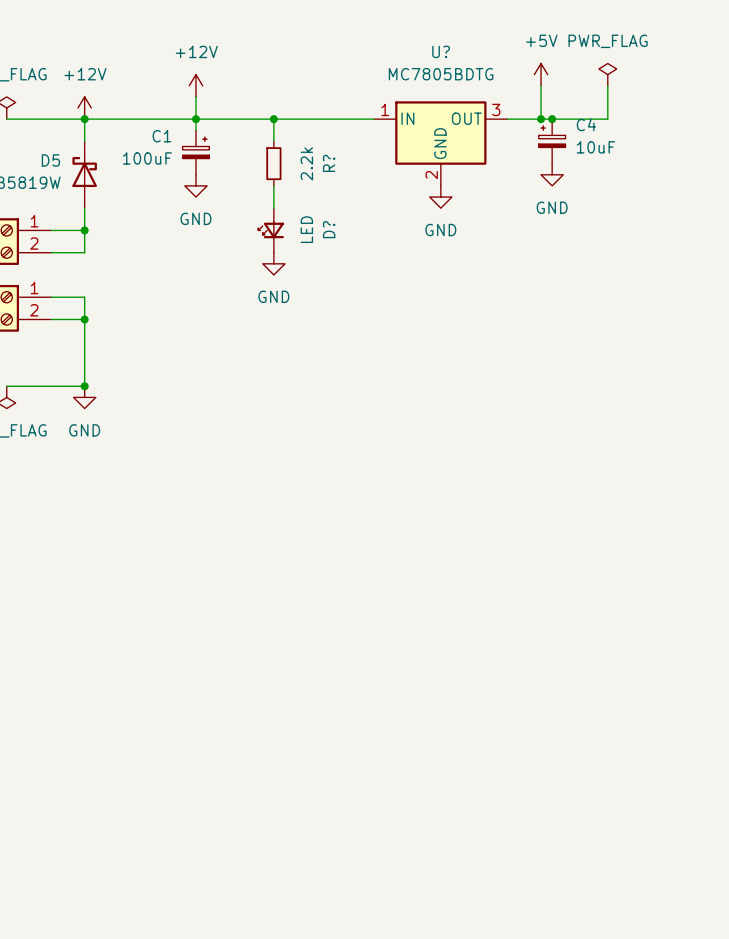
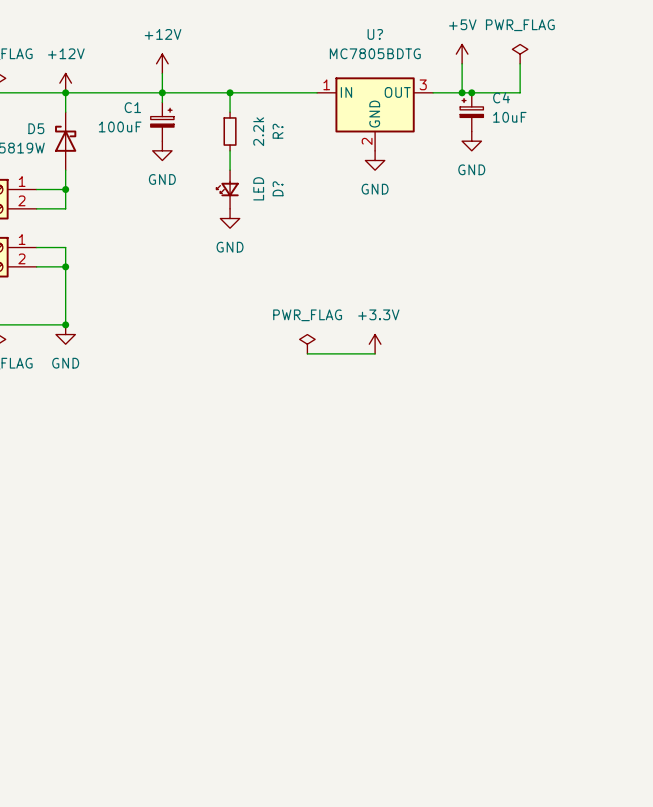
power symbol: none -> PWR_FLAG (307, 344)
power symbol: none -> +3.3V (375, 344)
wire: none -> (307, 353) (375, 353)

